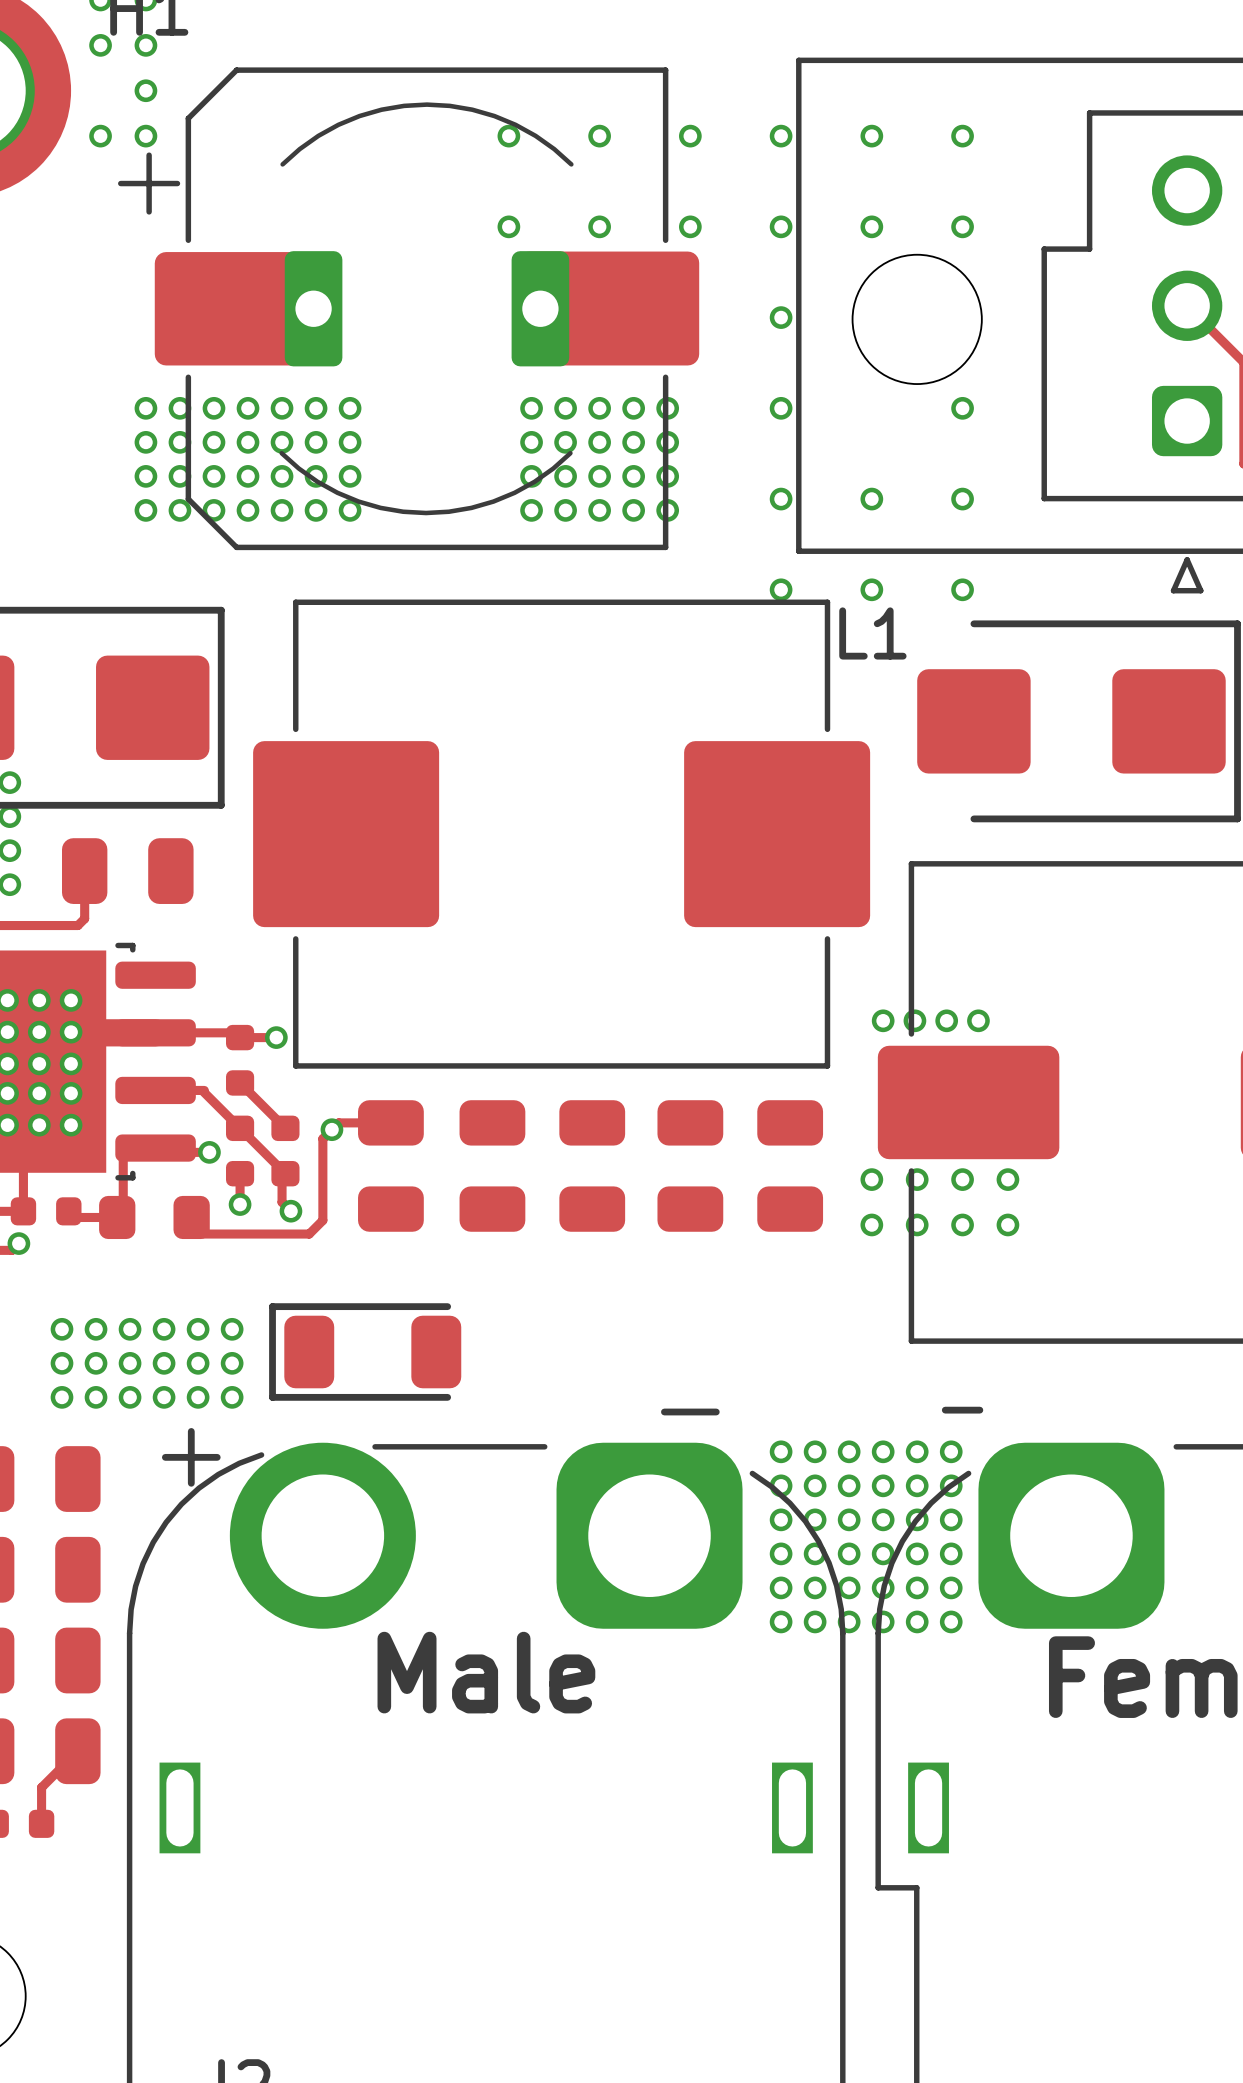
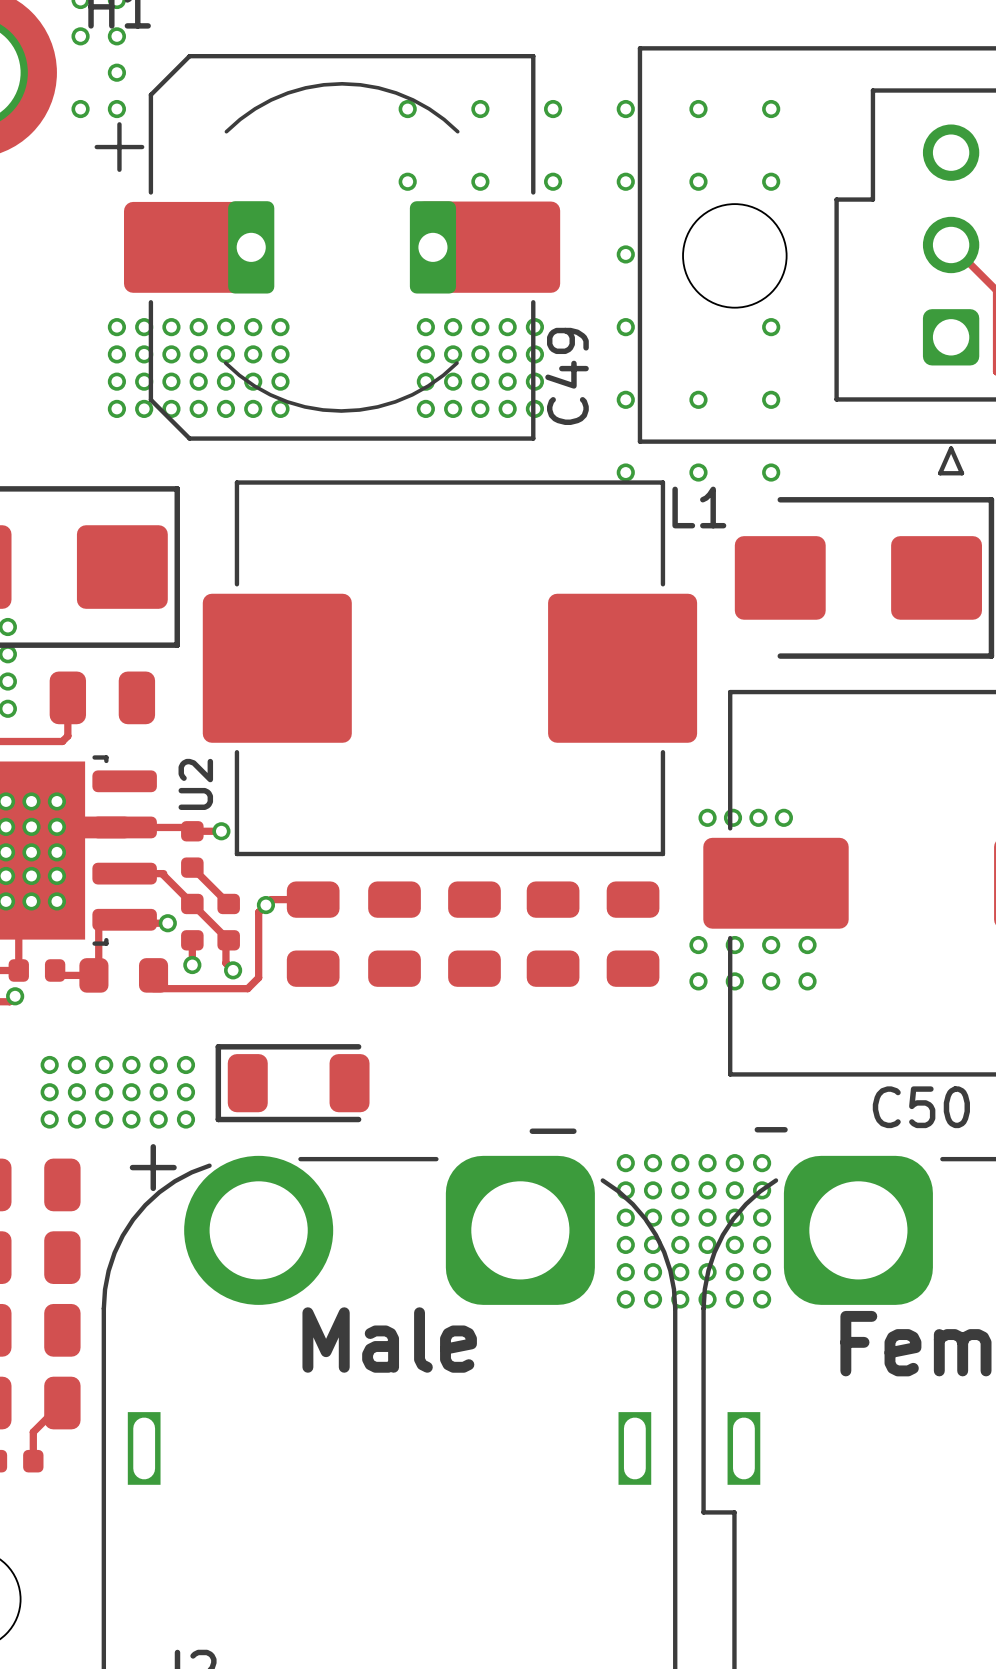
C49 name: none -> C49 (567, 376)
U2 name: none -> U2 (195, 784)
C50 name: none -> C50 (921, 1107)

